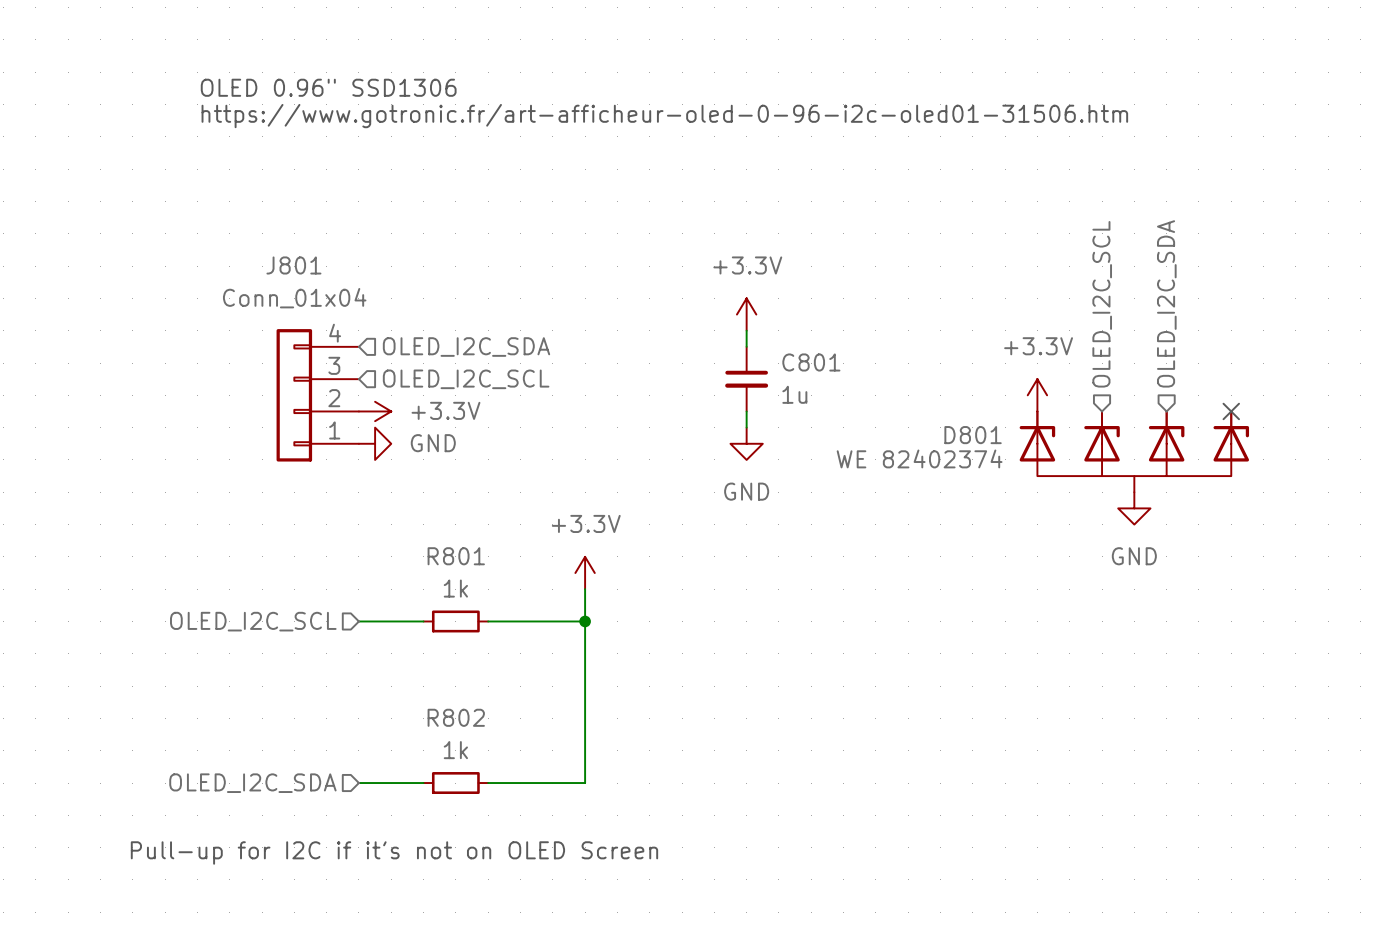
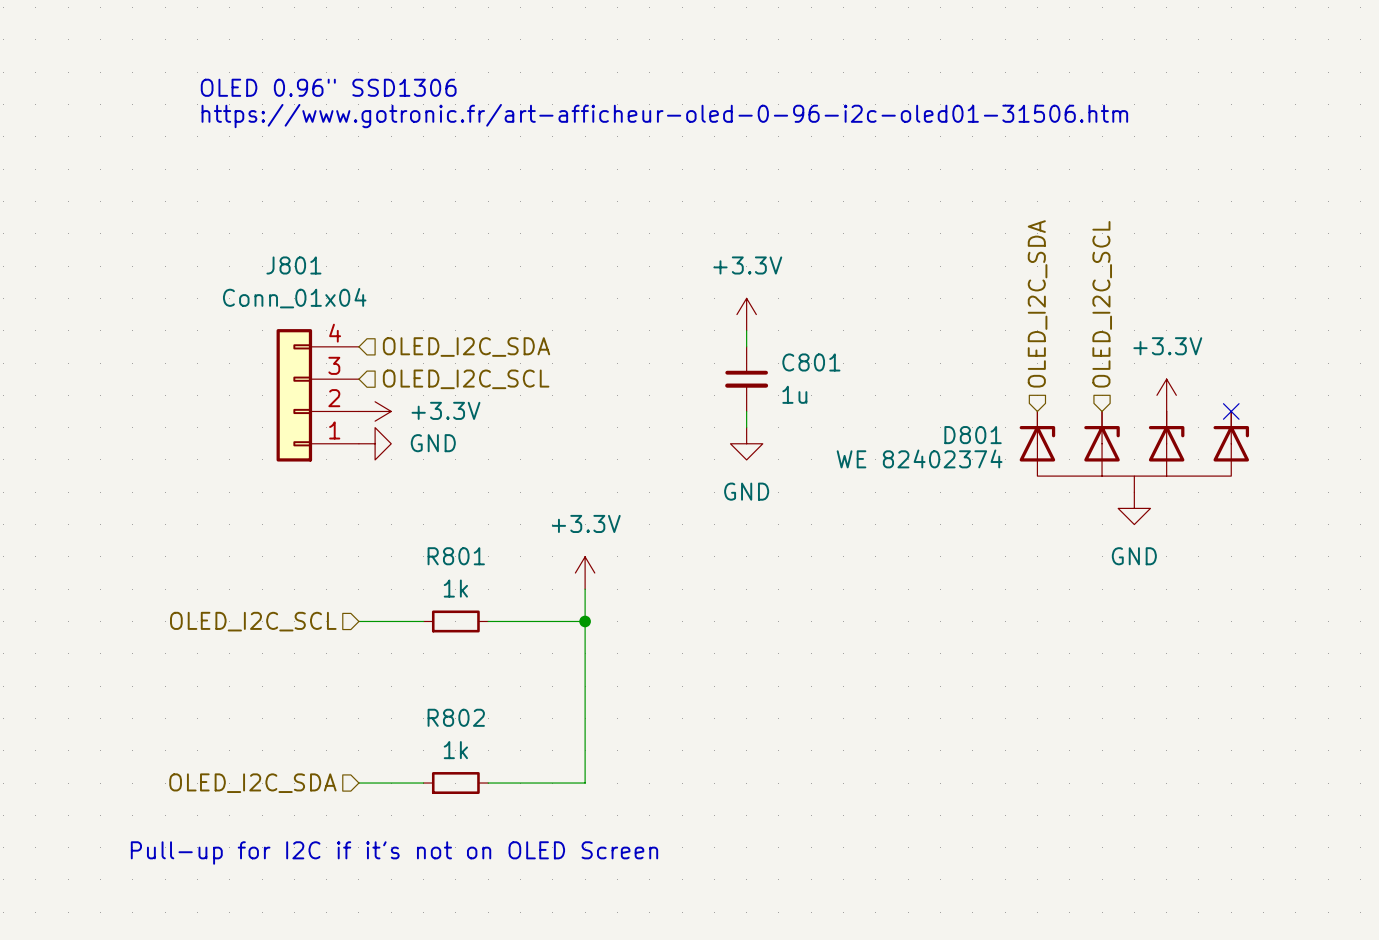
hierarchical label position: OLED_I2C_SDA (1166, 303) -> OLED_I2C_SDA (1037, 303)
power symbol position: +3.3V (1037, 395) -> +3.3V (1166, 395)

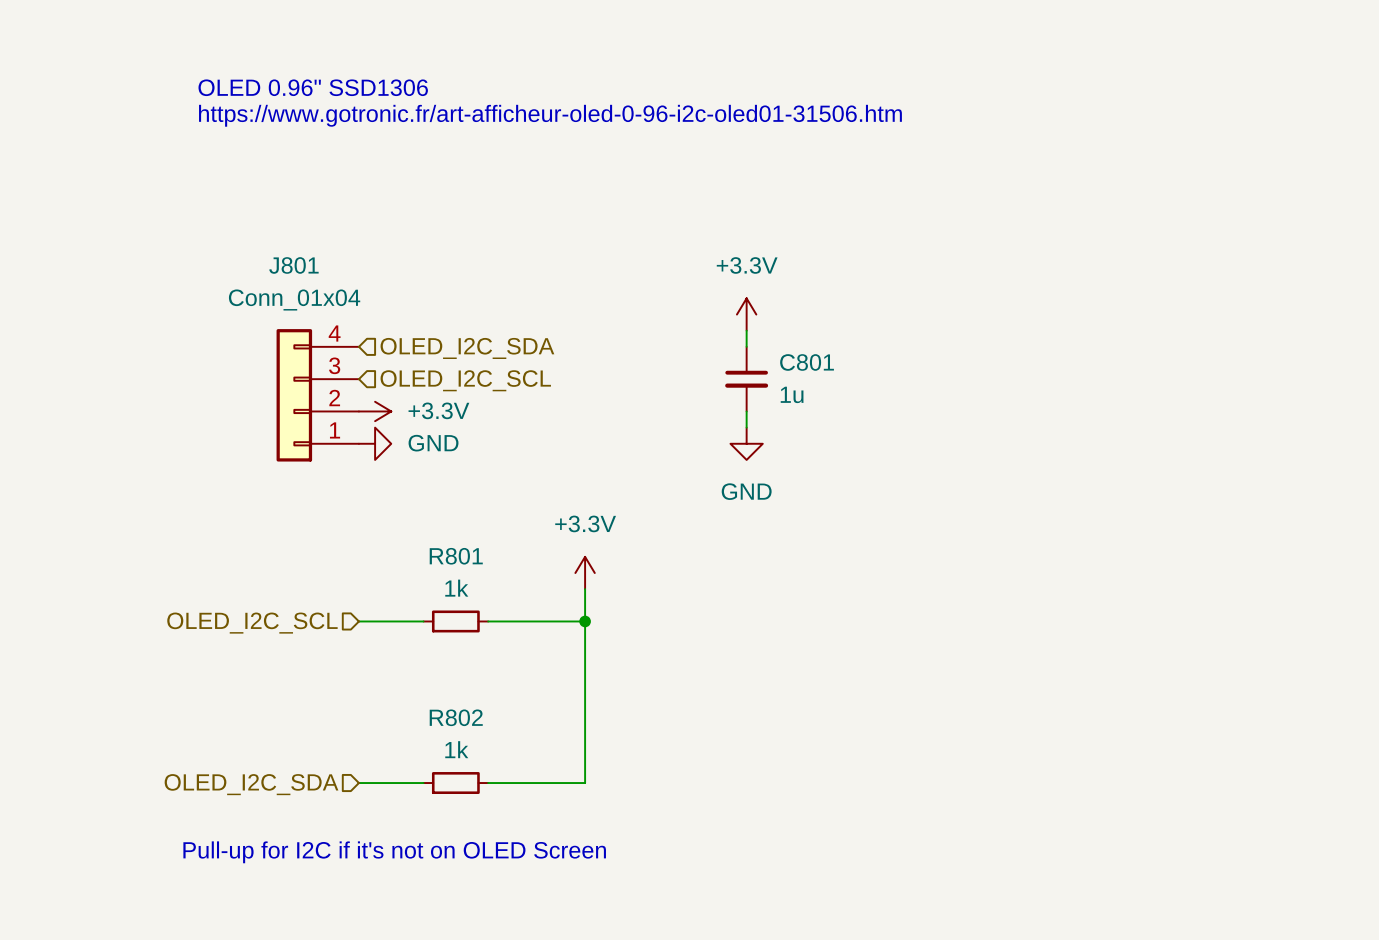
hierarchical label: OLED_I2C_SDA (1037, 303) -> none
hierarchical label: OLED_I2C_SCL (1102, 304) -> none
power symbol: +3.3V (1166, 395) -> none
no-connect mark: (1231, 411) -> none
D801: WE 82402374 (1134, 451) -> none
power symbol: GND (1134, 508) -> none

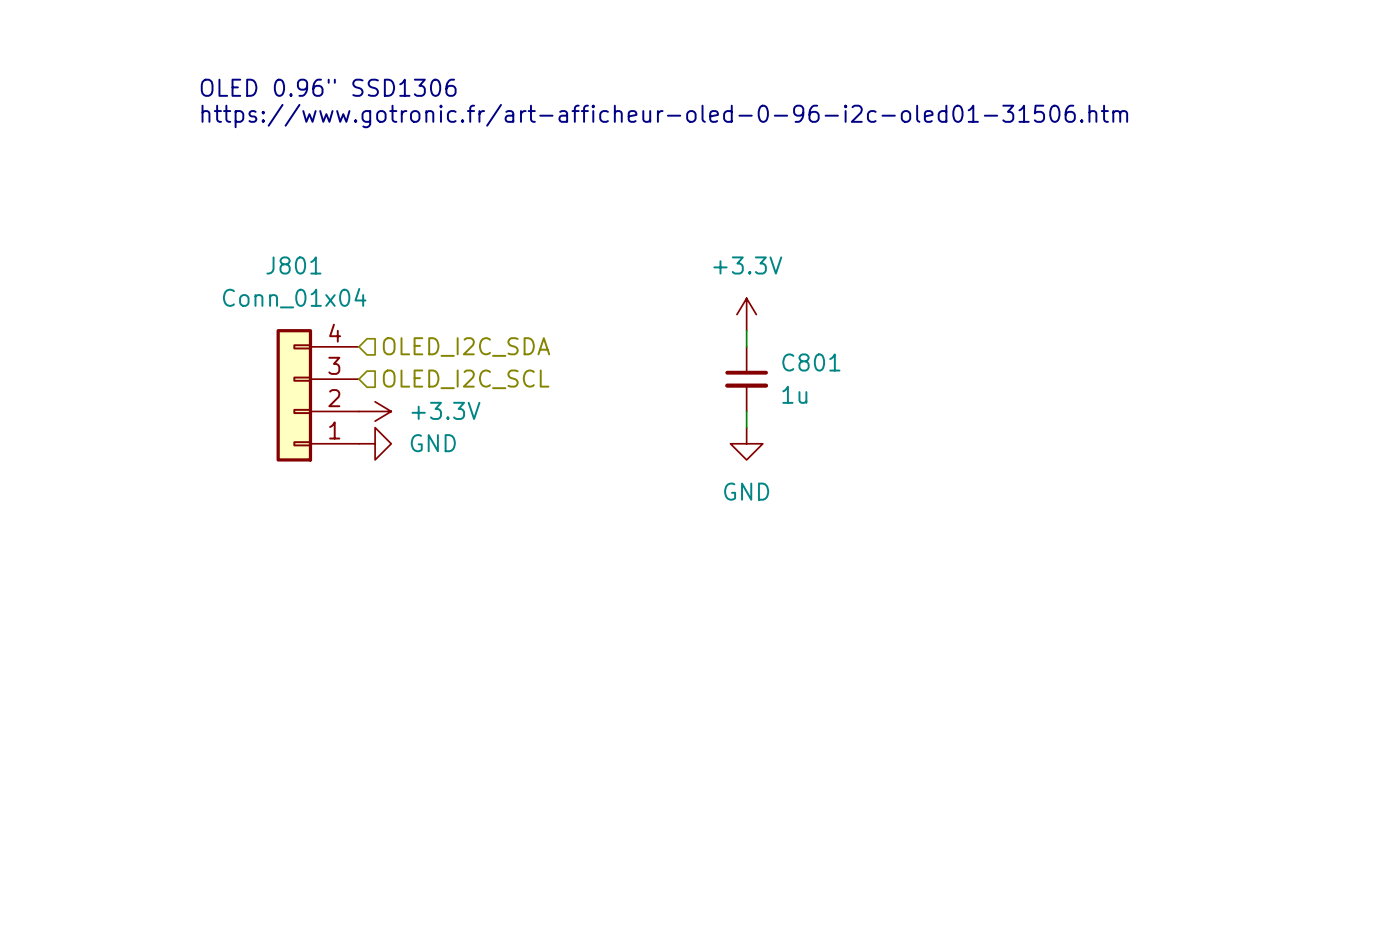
power symbol: +3.3V (585, 573) -> none
wire: (585, 589) (585, 783) (488, 783) -> none
wire: (358, 621) (423, 621) -> none
R801: 1k (455, 621) -> none
wire: (488, 621) (585, 621) -> none
junction: (585, 621) -> none
hierarchical label: OLED_I2C_SCL (252, 623) -> none
wire: (358, 783) (423, 783) -> none
R802: 1k (455, 783) -> none
hierarchical label: OLED_I2C_SDA (251, 784) -> none
text: Pull-up for I2C if it's not on OLED Screen (394, 852) -> none

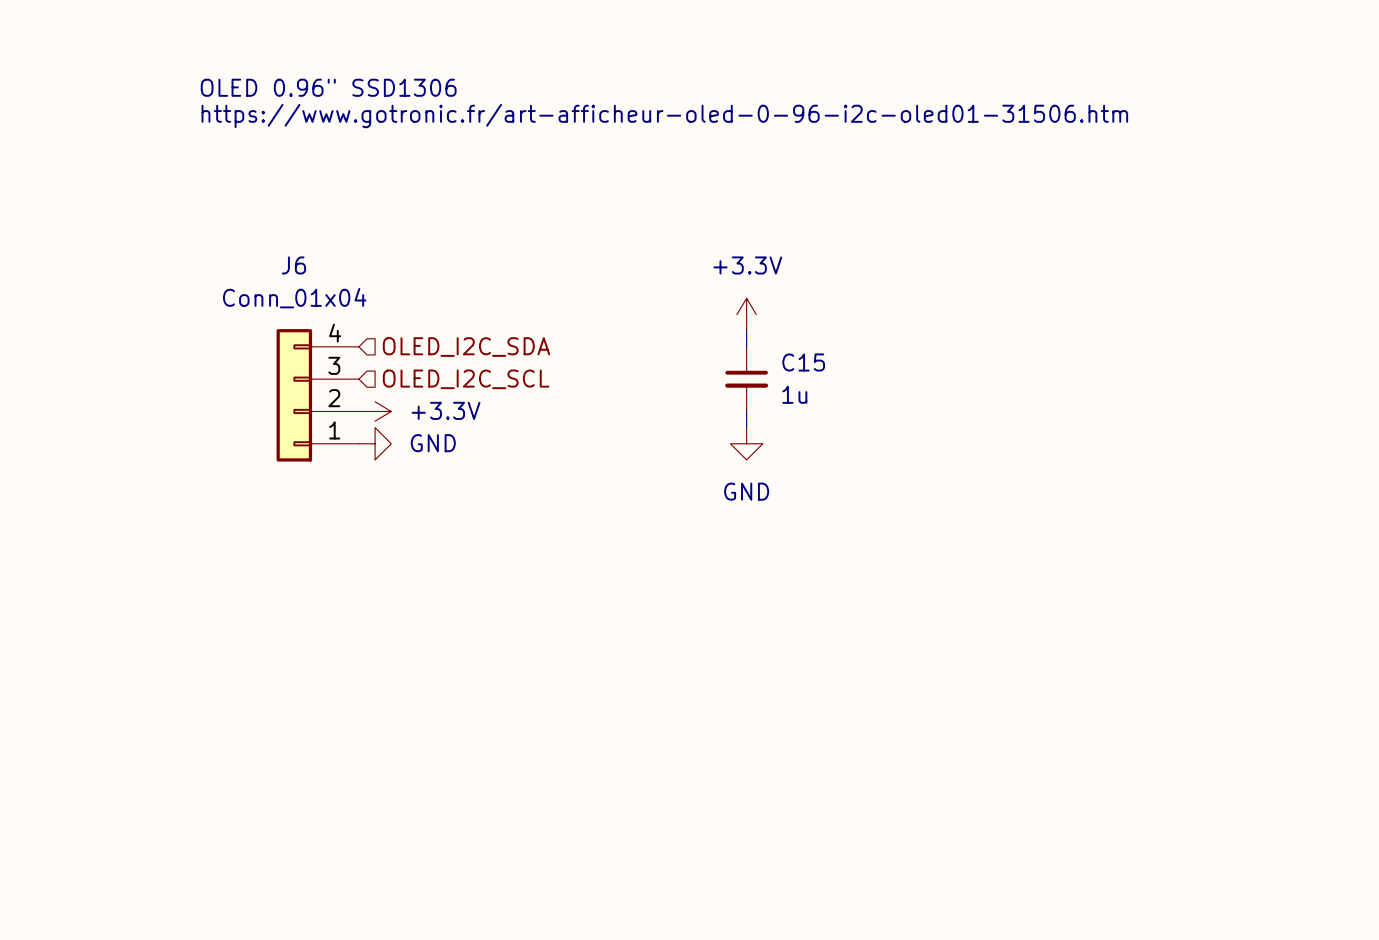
J801 name: J801 (293, 265) -> J6 (293, 265)
C801 name: C801 (811, 362) -> C15 (803, 362)

